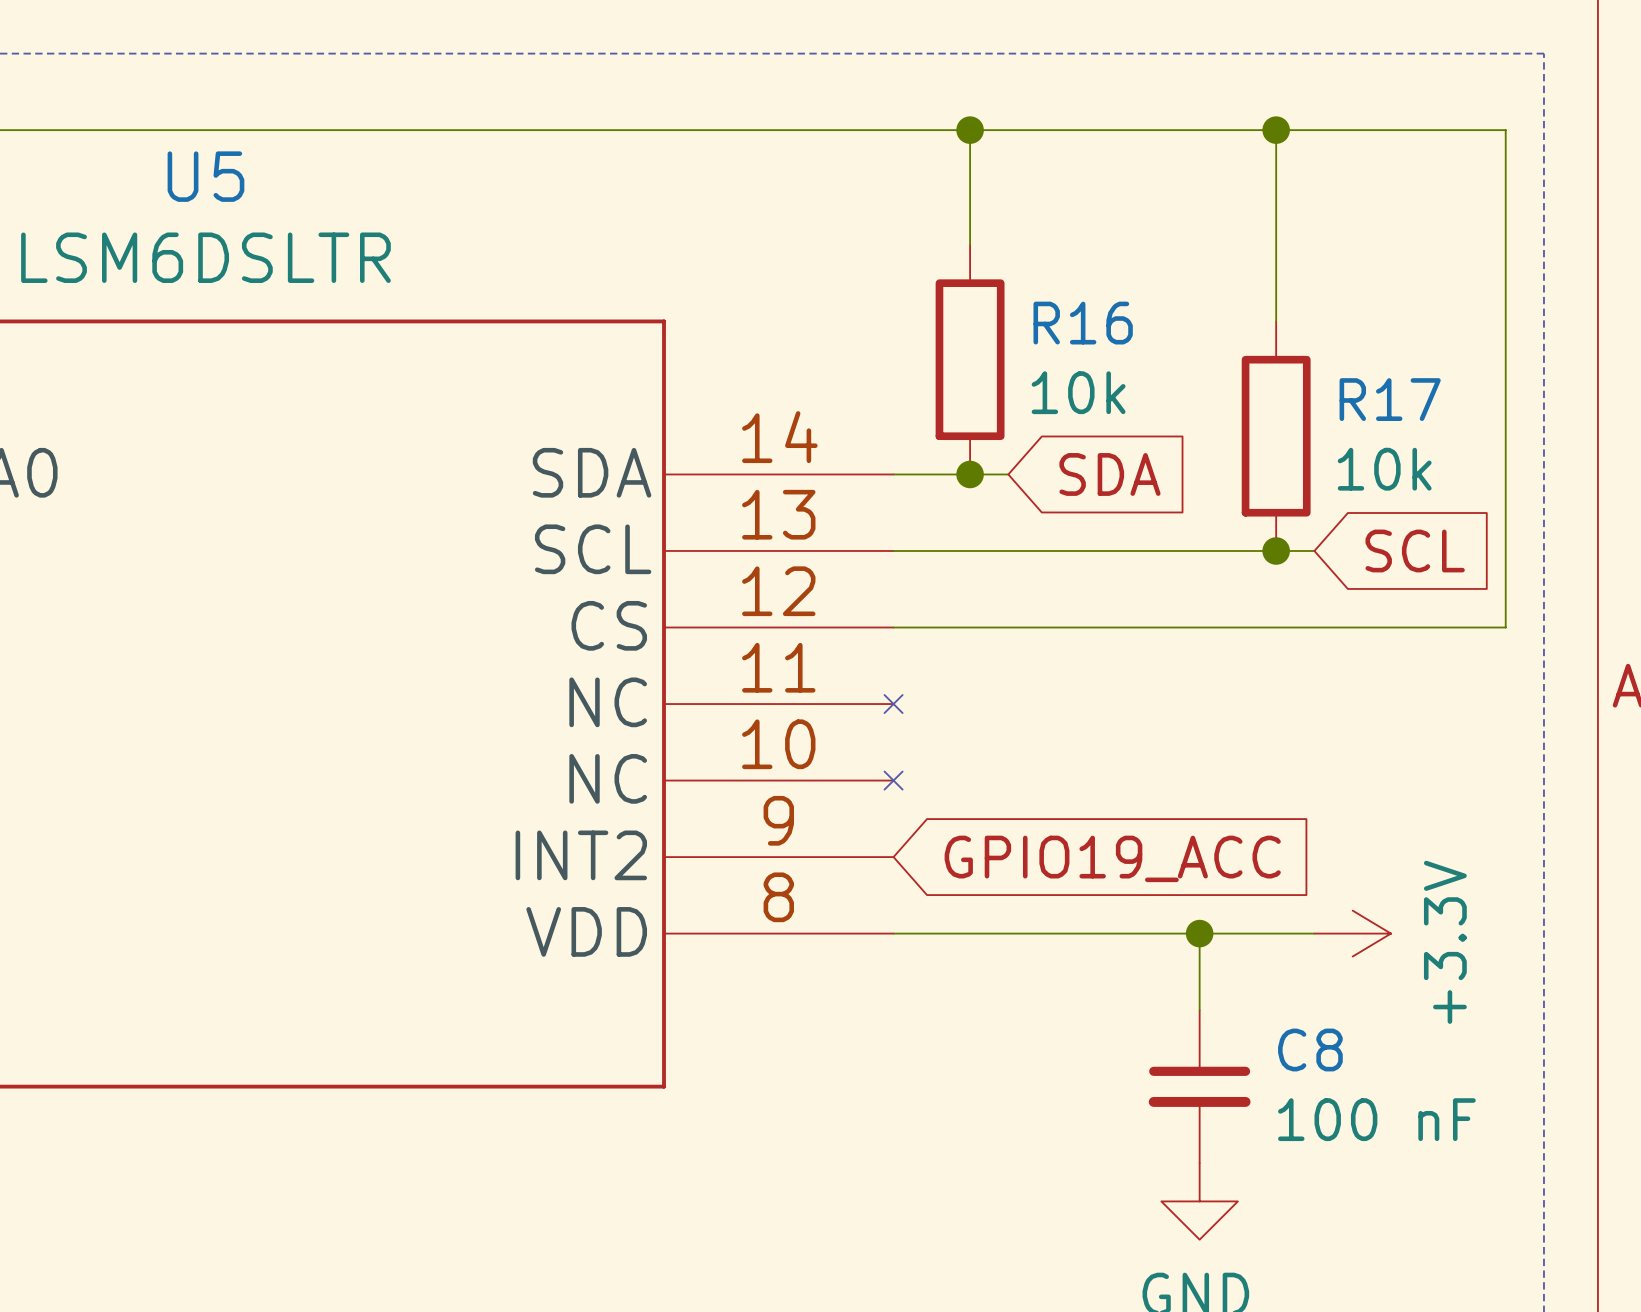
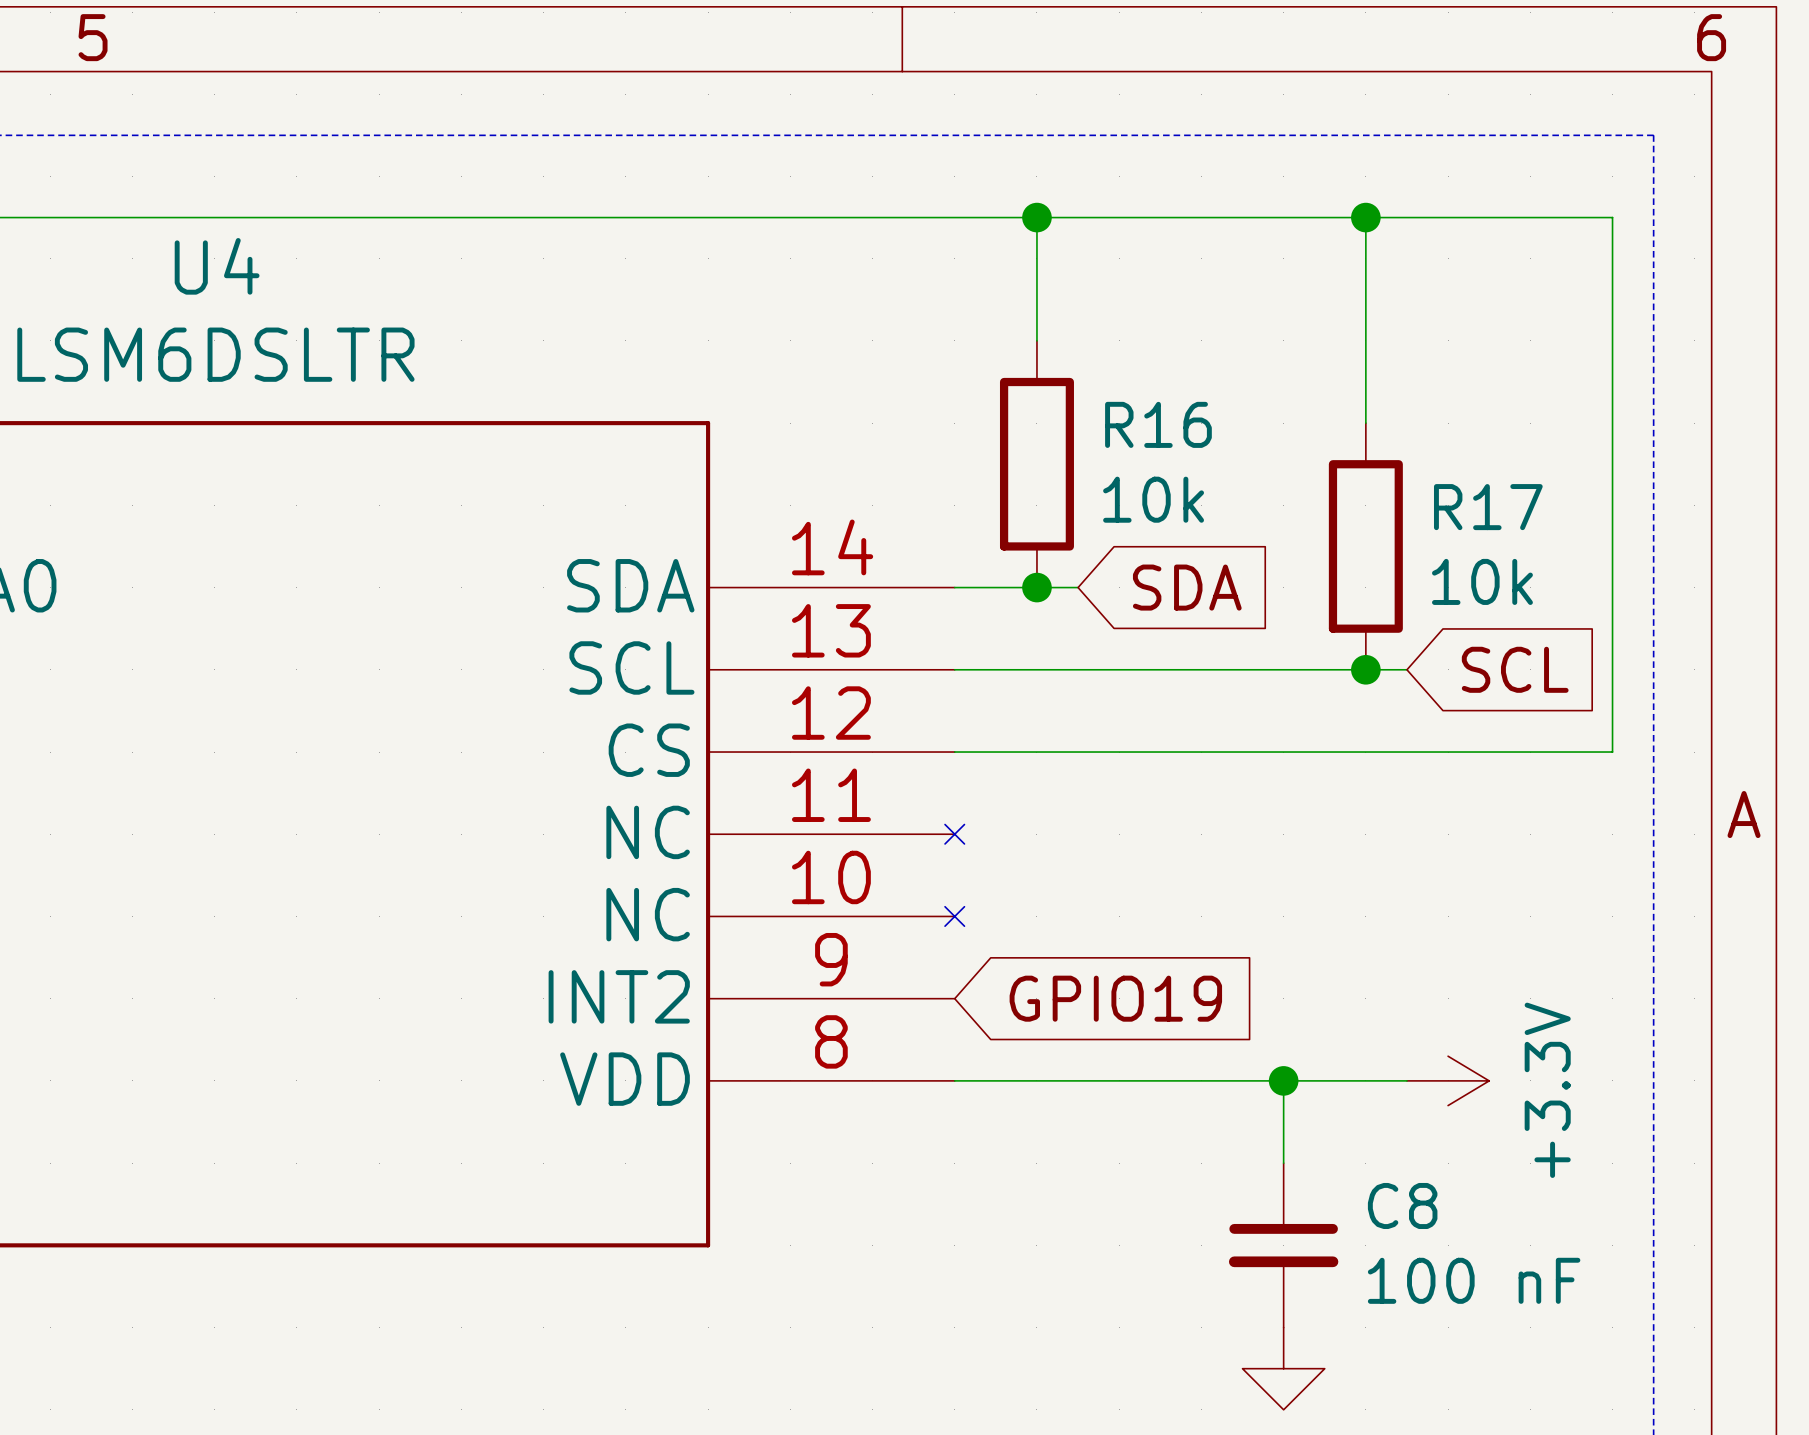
U5 name: U5 (205, 176) -> U4 (217, 266)
global label: GPIO19_ACC (1112, 858) -> GPIO19 (1115, 998)

